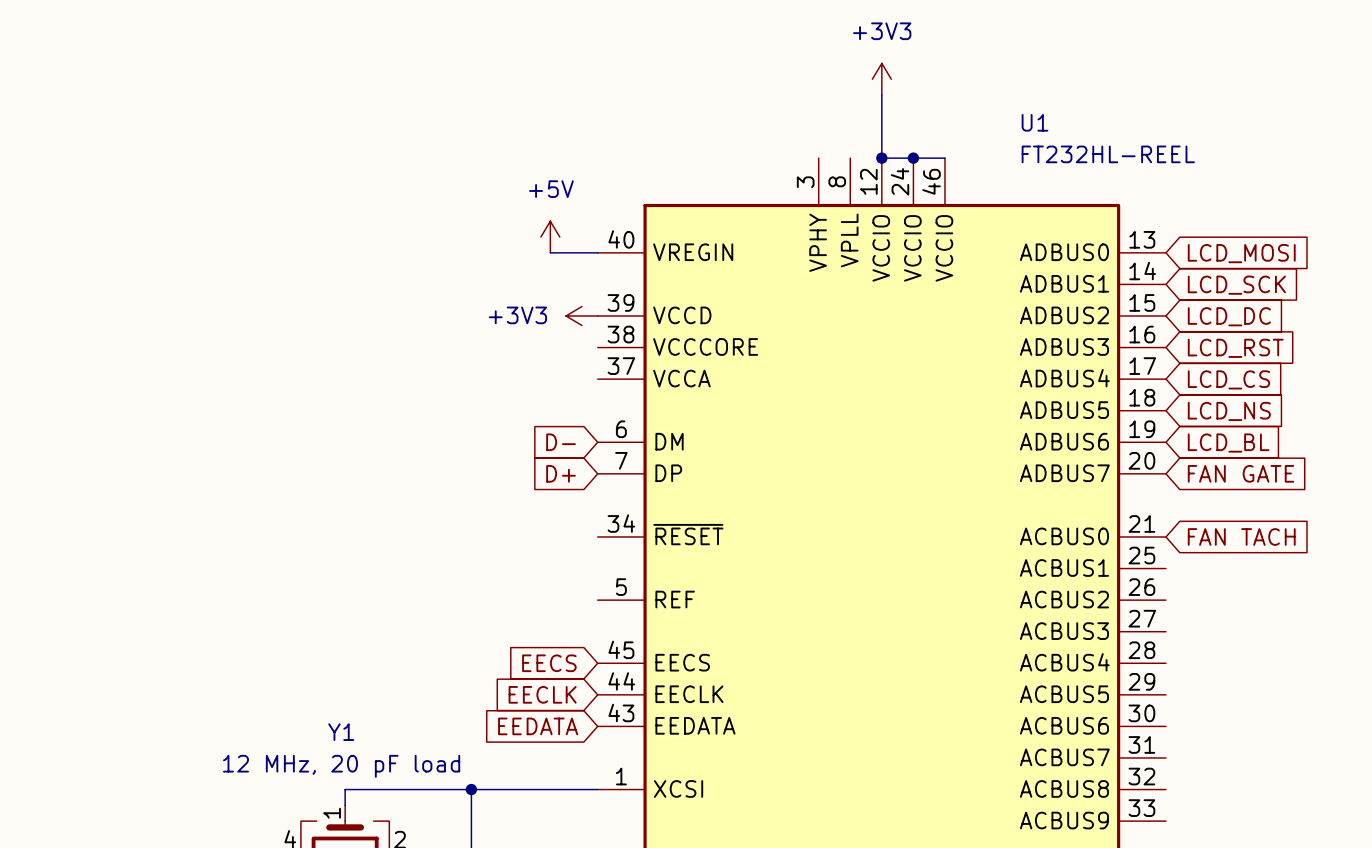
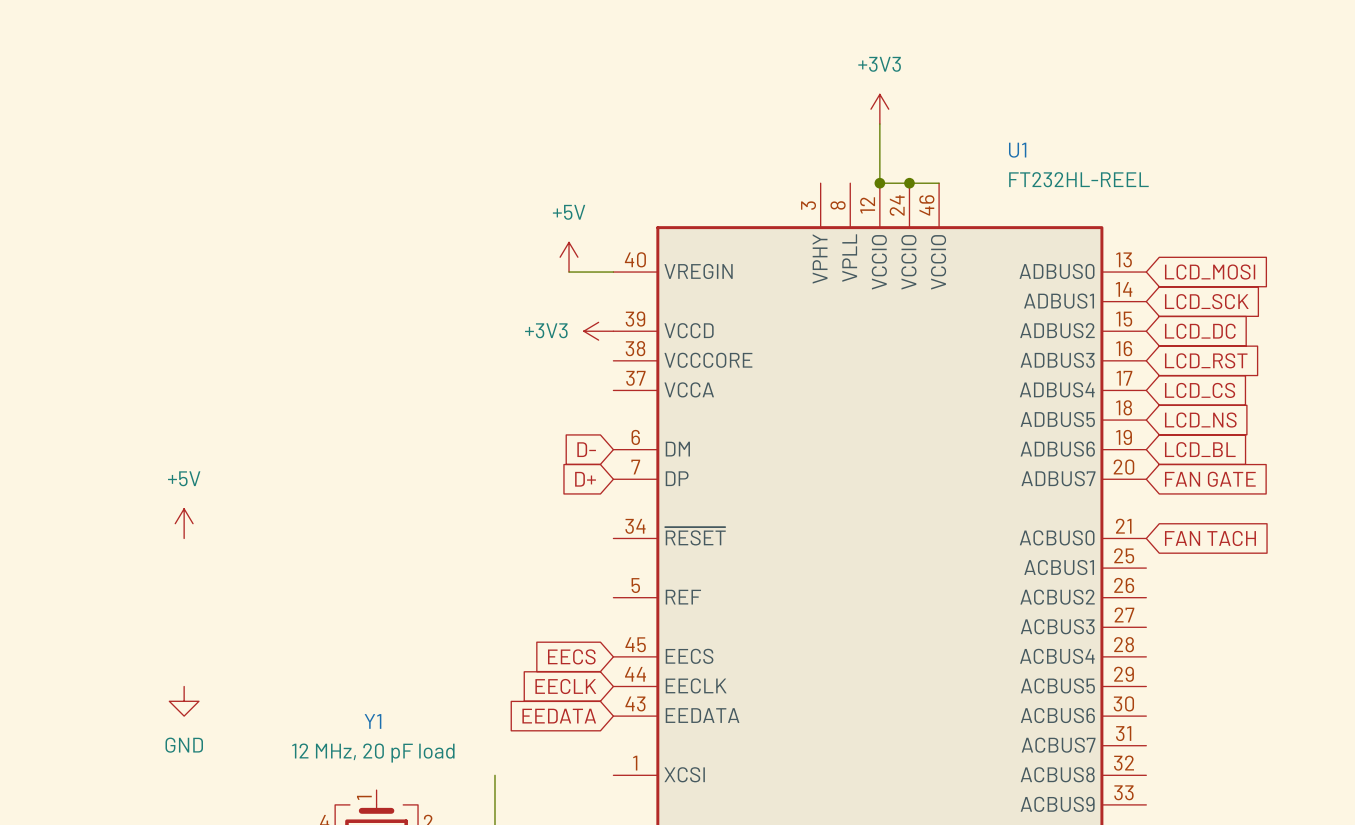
power symbol: none -> +5V (184, 523)
power symbol: none -> GND (184, 701)
junction: (471, 789) -> none
wire: (597, 789) (345, 789) (345, 805) -> none

